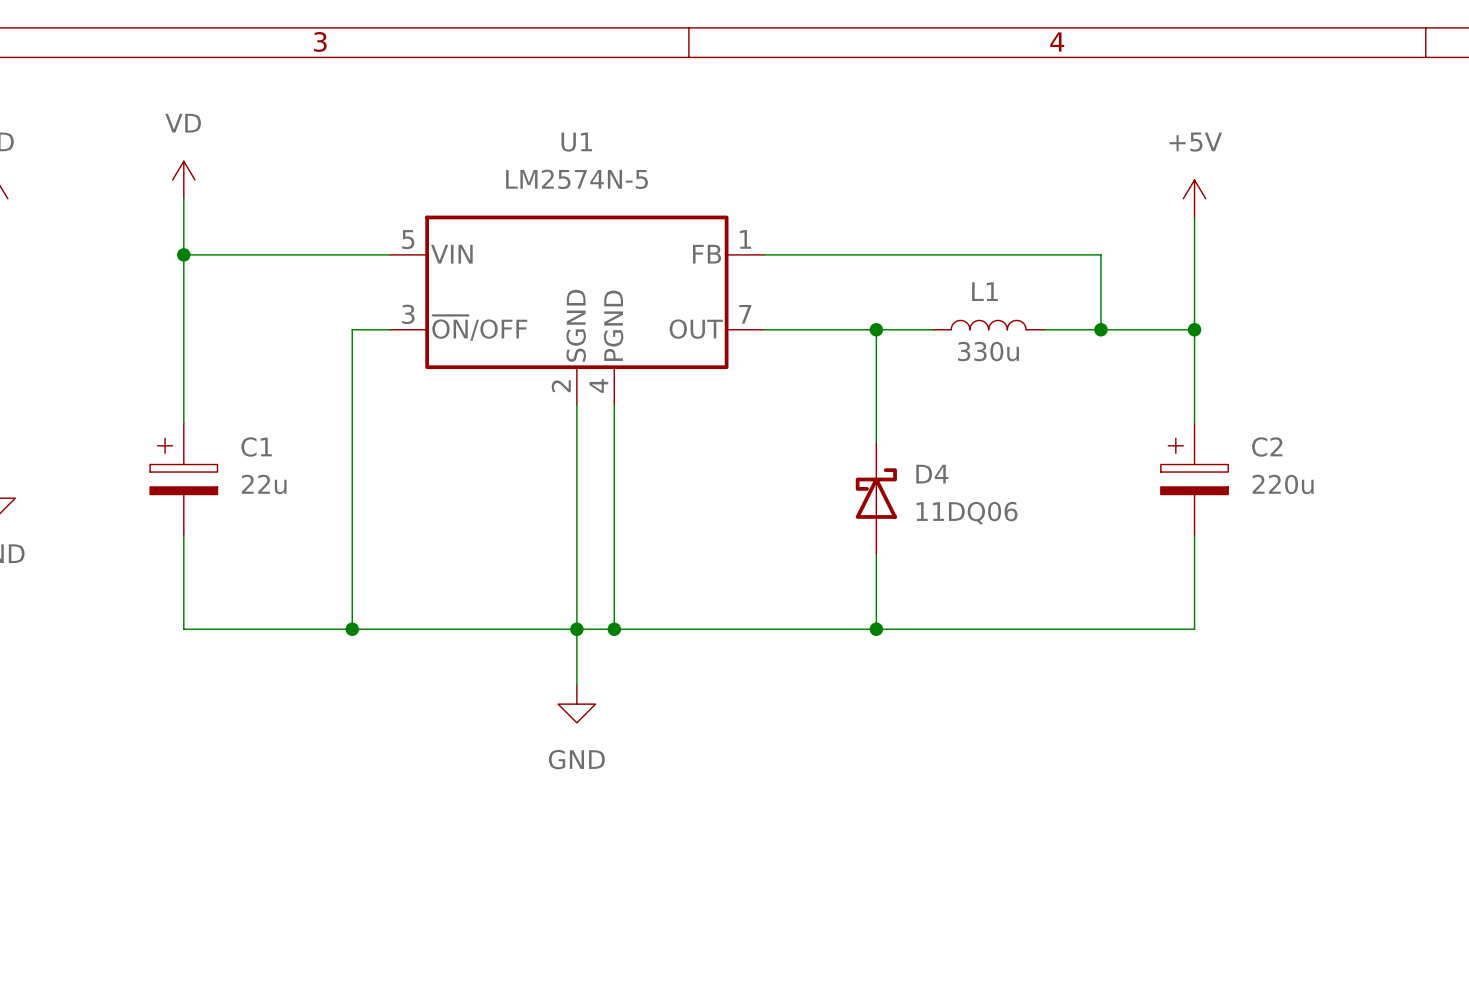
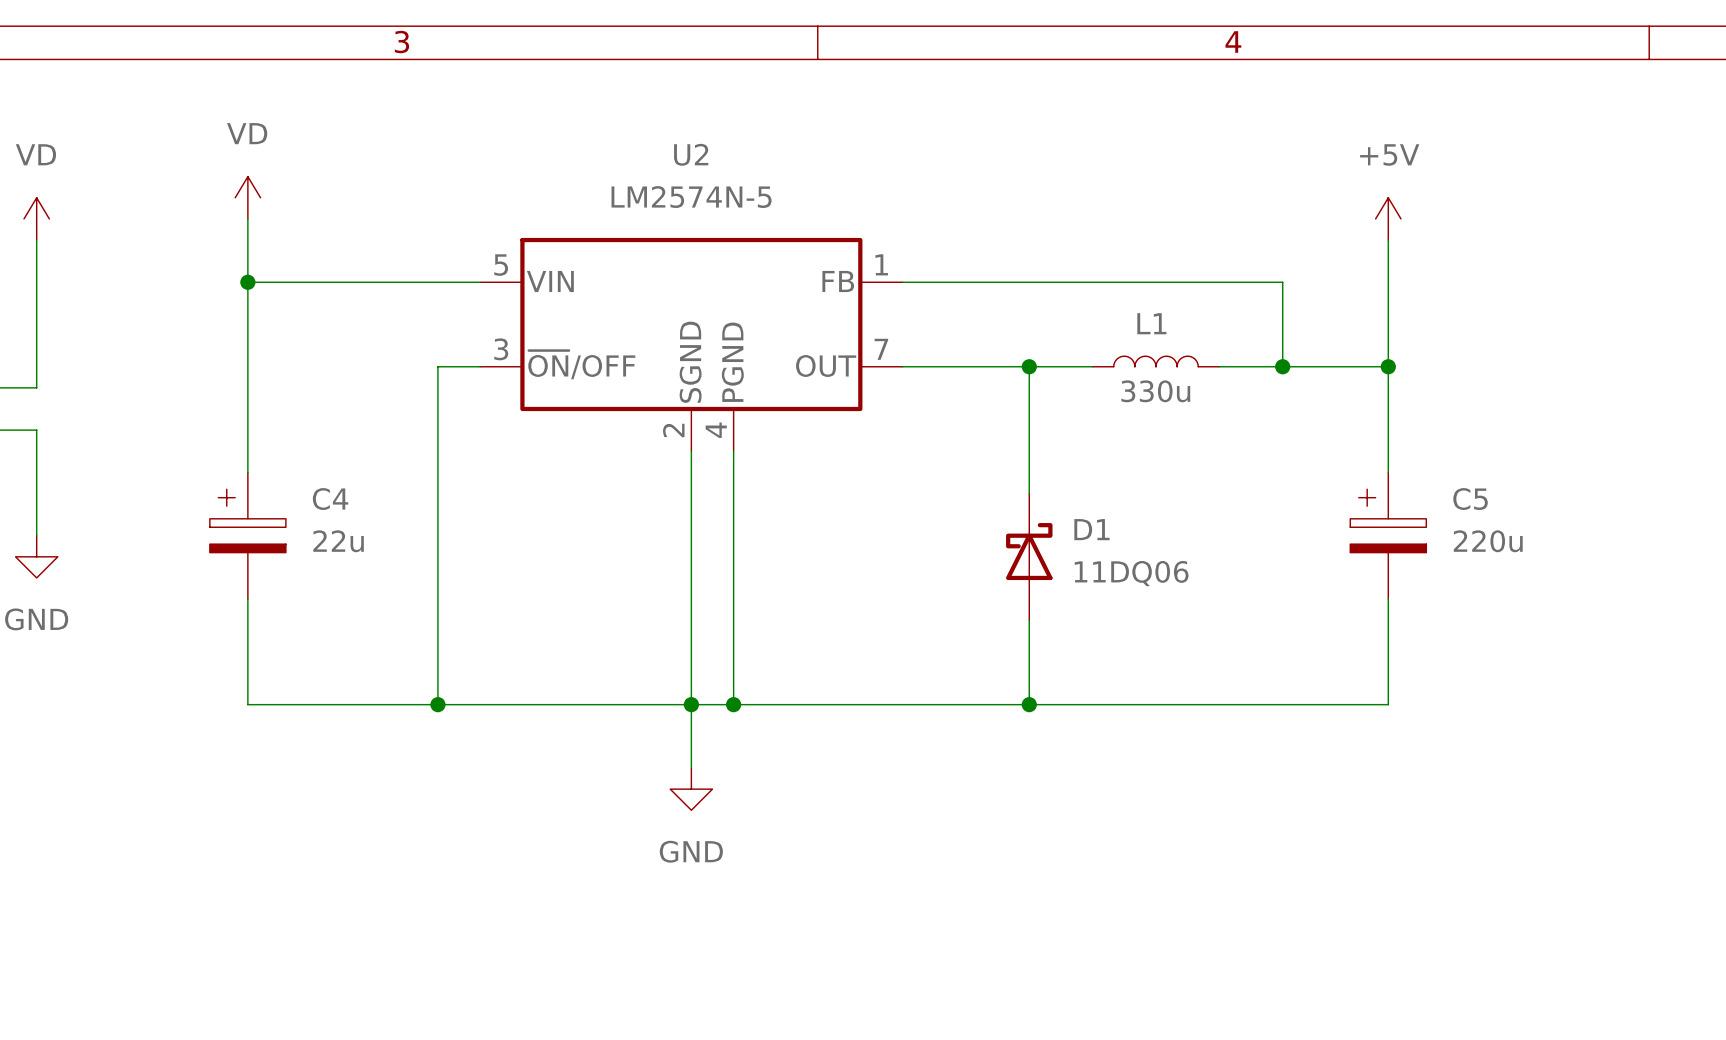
U1 name: U1 (576, 142) -> U2 (691, 154)
C1 name: C1 (256, 447) -> C4 (330, 499)
C2 name: C2 (1267, 447) -> C5 (1470, 499)
D4 name: D4 (932, 474) -> D1 (1091, 529)

